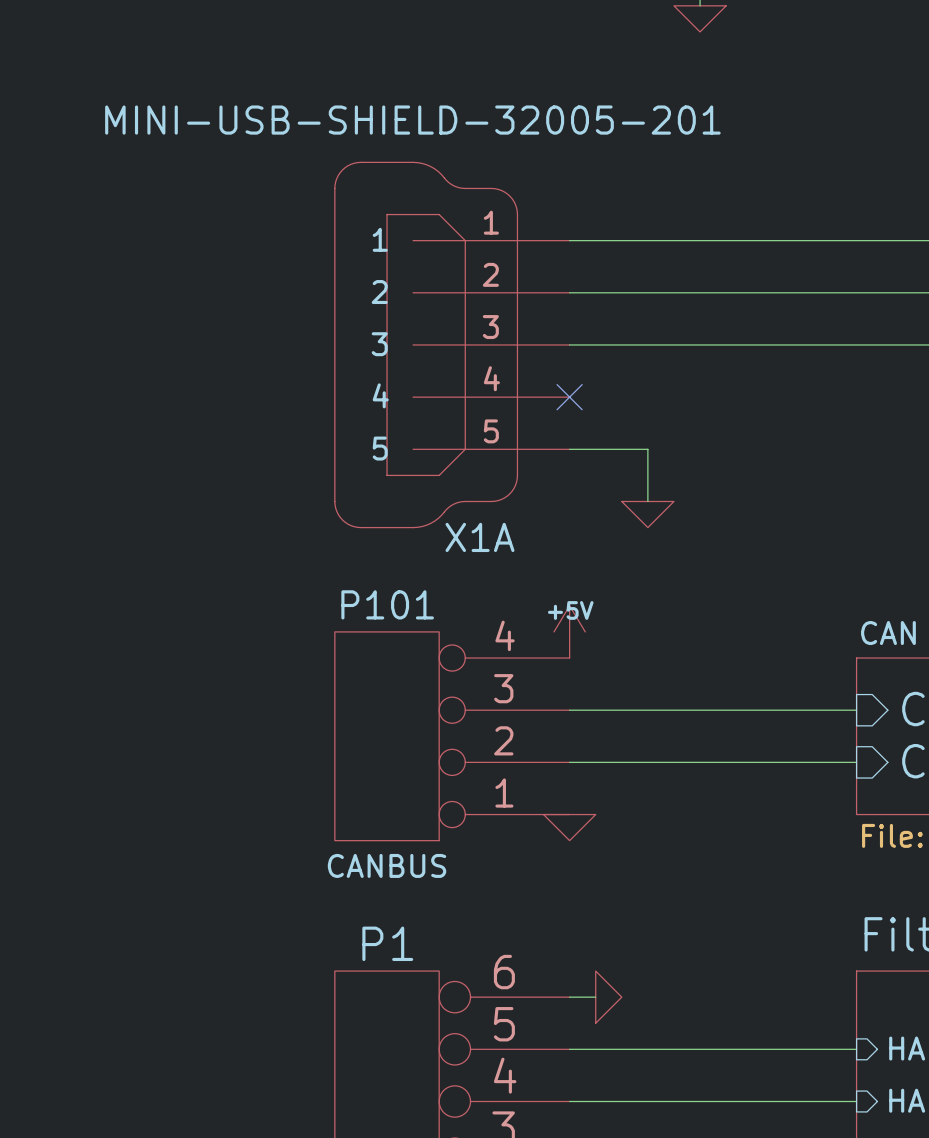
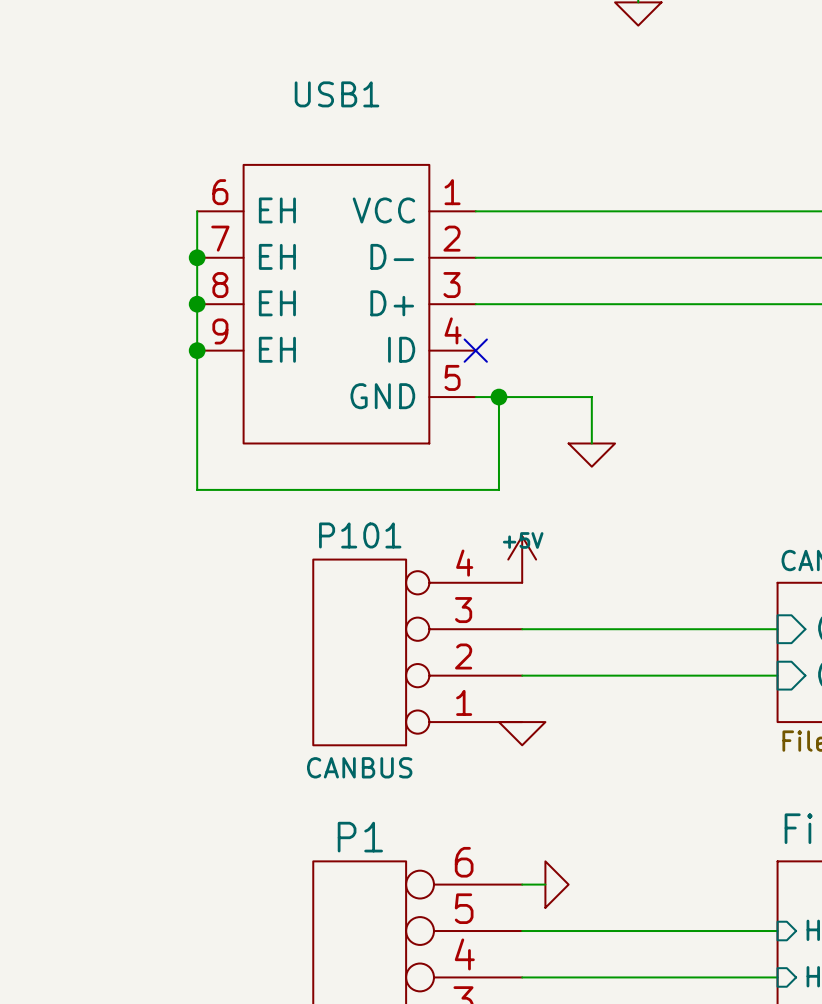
wire: none -> (197, 211) (197, 489) (498, 489) (498, 397)
junction: none -> (197, 257)
junction: none -> (197, 304)
USB1: none -> (336, 304)
X1A: MINI-USB-SHIELD-32005-201 (452, 344) -> none
junction: none -> (197, 350)
no-connect mark position: (569, 397) -> (475, 350)
junction: none -> (498, 397)

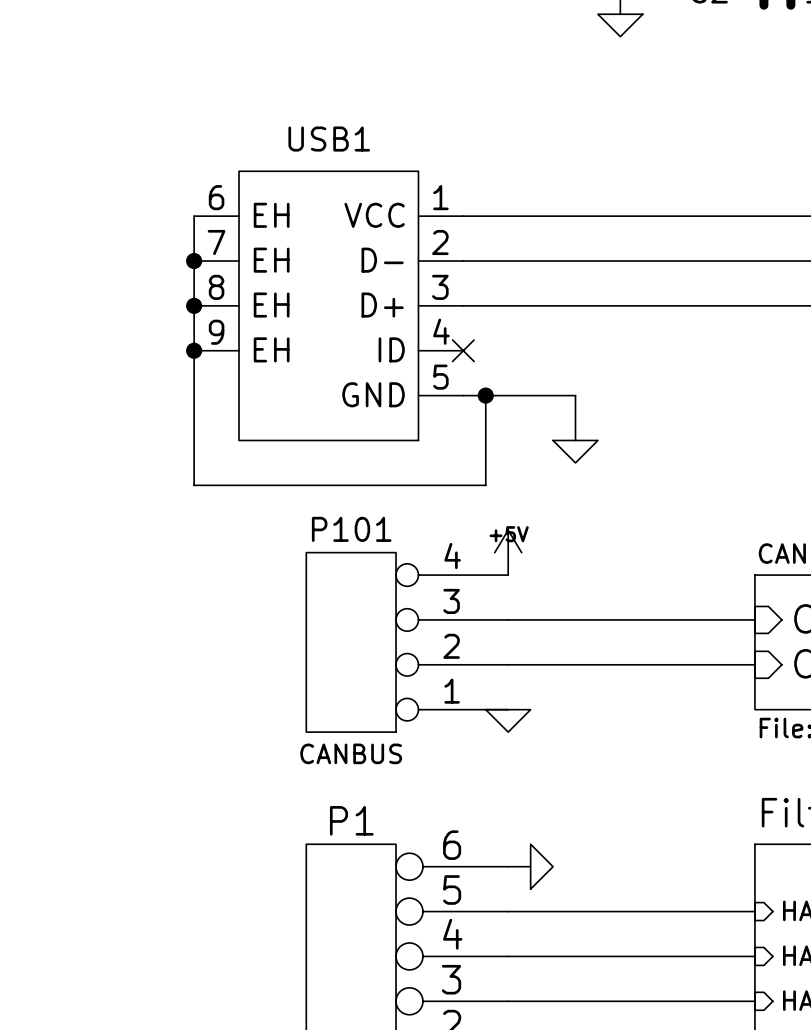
USB1 name position: USB1 (337, 94) -> USB1 (329, 139)

